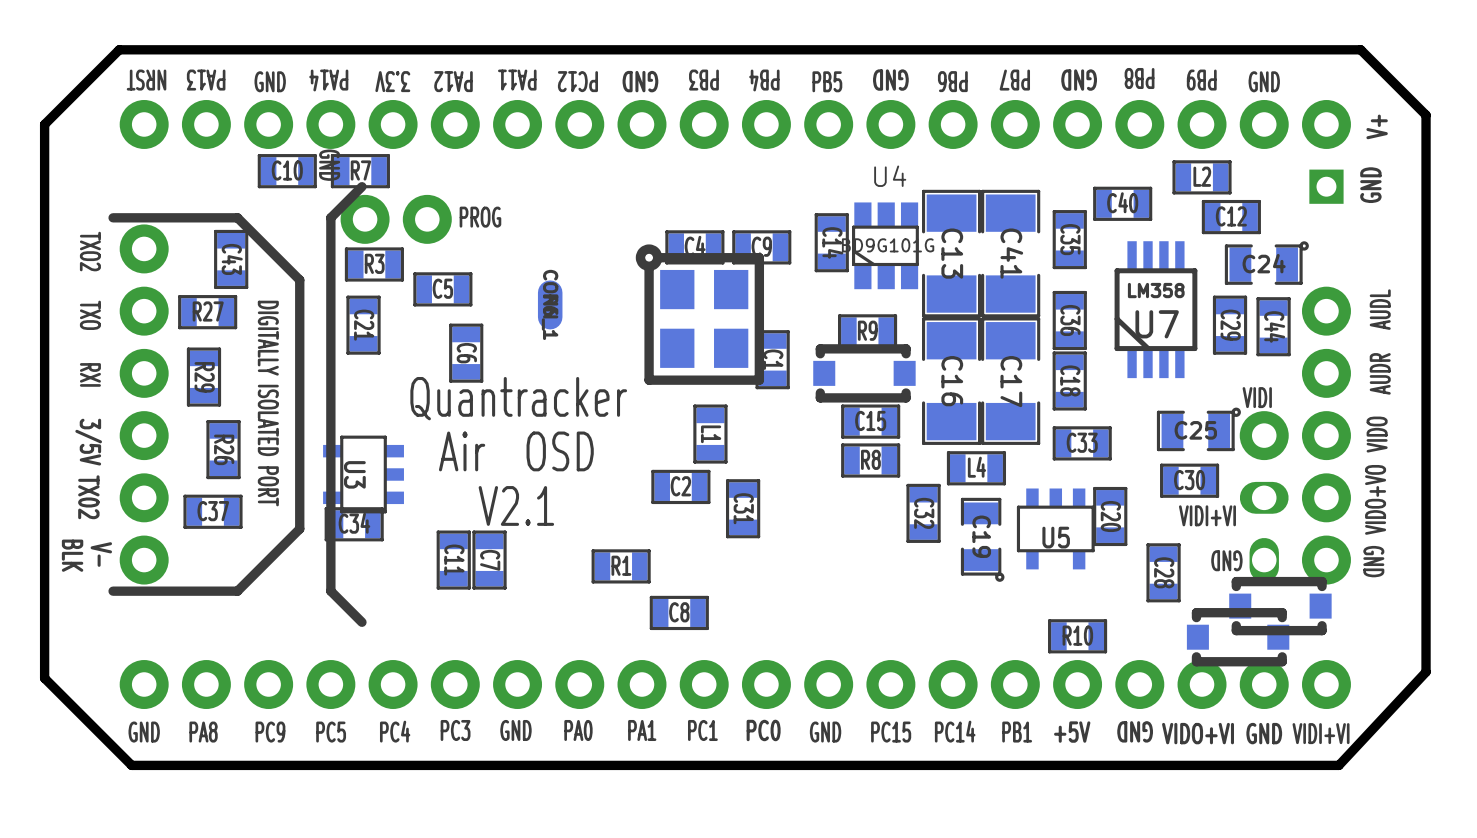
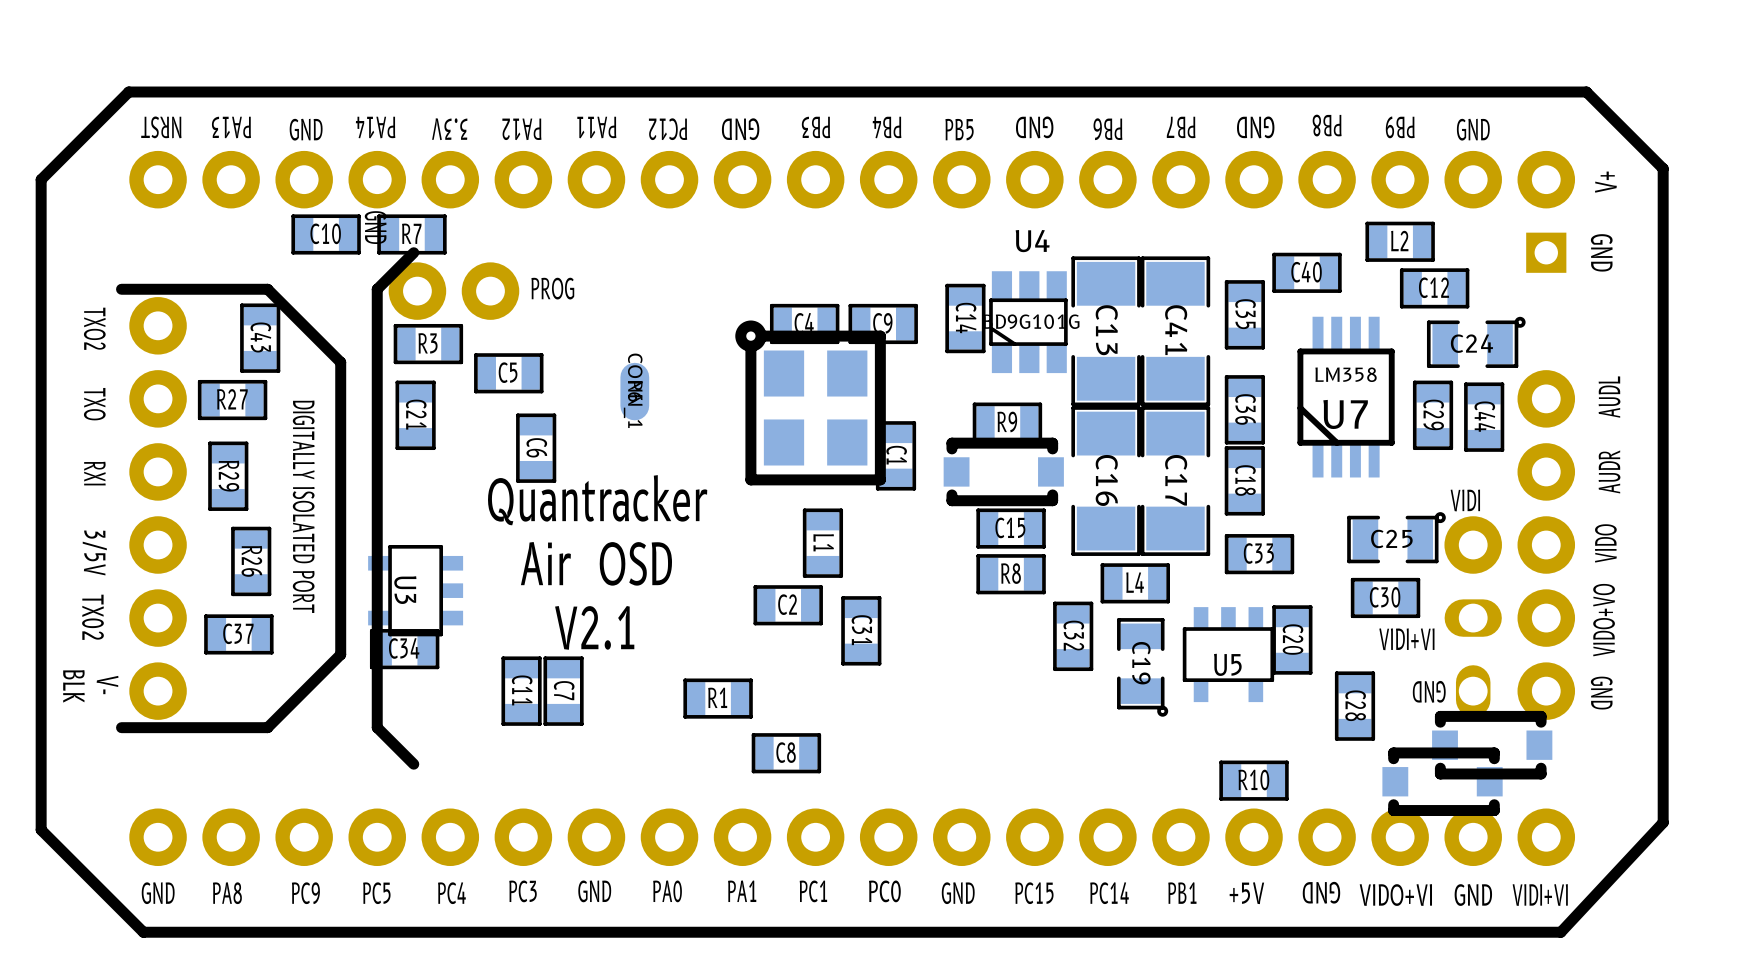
text rotation: 0° (1370, 185) -> 180° (1601, 252)

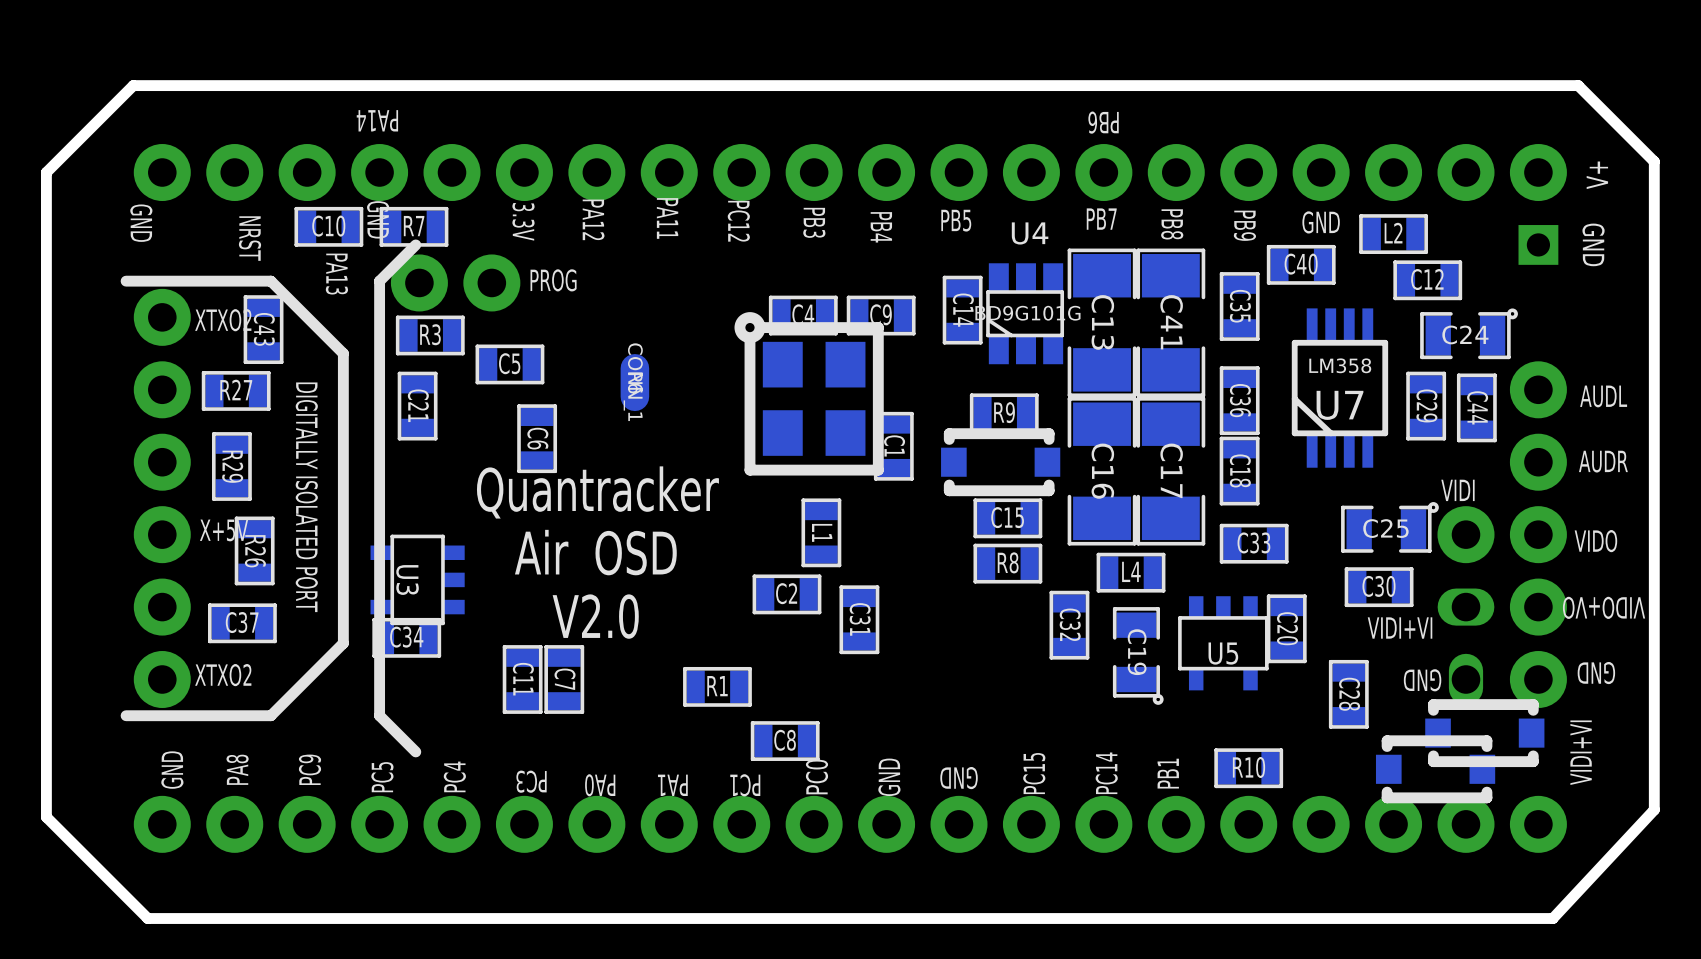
text rotation: 0° (1327, 125) -> 90° counterclockwise (1172, 224)
text position: PB8 (1327, 125) -> PB8 (1172, 224)
text rotation: 0° (161, 127) -> 90° counterclockwise (250, 238)
text position: NRST (161, 127) -> NRST (250, 238)
text rotation: 0° (231, 127) -> 90° counterclockwise (336, 274)
text position: PA13 (231, 127) -> PA13 (336, 274)
text rotation: 0° (596, 127) -> 90° counterclockwise (667, 218)
text position: PA11 (596, 127) -> PA11 (667, 218)
text rotation: 0° (815, 127) -> 90° counterclockwise (814, 222)
text position: PB3 (815, 127) -> PB3 (814, 222)
text rotation: 0° (887, 127) -> 90° counterclockwise (881, 227)
text position: PB4 (887, 127) -> PB4 (881, 227)
text: GND (1034, 127) -> none
text rotation: 0° (1181, 127) -> 180° (1101, 219)
text position: PB7 (1181, 127) -> PB7 (1101, 219)
text: GND (1255, 127) -> none
text rotation: 0° (1400, 127) -> 90° counterclockwise (1244, 225)
text position: PB9 (1400, 127) -> PB9 (1244, 225)
text rotation: 0° (306, 129) -> 90° clockwise (141, 223)
text position: GND (306, 129) -> GND (141, 223)
text rotation: 0° (449, 129) -> 90° counterclockwise (523, 221)
text position: 3.3V (449, 129) -> 3.3V (523, 221)
text rotation: 0° (521, 129) -> 90° counterclockwise (593, 219)
text position: PA12 (521, 129) -> PA12 (593, 219)
text rotation: 0° (668, 129) -> 90° counterclockwise (738, 221)
text position: PC12 (668, 129) -> PC12 (738, 221)
text: GND (740, 129) -> none
text position: PB5 (959, 129) -> PB5 (956, 220)
text: GND (1473, 129) -> none
text: none -> GND (1321, 222)
text: TXO2 (94, 328) -> none
text: none -> XTXO2 (223, 320)
text rotation: 0° (1609, 397) -> 90° clockwise (1603, 396)
text: TXO (94, 404) -> none
text rotation: 0° (1609, 471) -> 90° clockwise (1603, 461)
text: RXI (94, 473) -> none
text: none -> X+5V (224, 530)
text rotation: 0° (1605, 543) -> 90° clockwise (1595, 541)
text: 3/5V (94, 552) -> none
text: TX02 (92, 617) -> none
text rotation: 0° (1604, 620) -> 90° counterclockwise (1604, 607)
text: V2.1 (594, 627) -> V2.0 (595, 616)
text: V- (107, 685) -> none
text: BLK (73, 686) -> none
text: none -> XTXO2 (223, 675)
text rotation: 0° (1601, 693) -> 90° clockwise (1596, 673)
text: none -> GND (889, 777)
text: none -> GND (959, 778)
text rotation: 0° (523, 891) -> 180° (531, 781)
text position: PC3 (523, 891) -> PC3 (531, 781)
text: GND (594, 891) -> none
text rotation: 0° (667, 891) -> 180° (600, 785)
text position: PA0 (667, 891) -> PA0 (600, 785)
text rotation: 0° (742, 891) -> 180° (672, 785)
text position: PA1 (742, 891) -> PA1 (672, 785)
text rotation: 0° (813, 891) -> 180° (745, 785)
text position: PC1 (813, 891) -> PC1 (745, 785)
text rotation: 0° (884, 891) -> 90° counterclockwise (816, 776)
text position: PC0 (884, 891) -> PC0 (816, 776)
text: GND (1321, 892) -> none
text rotation: 0° (158, 893) -> 90° counterclockwise (172, 770)
text position: GND (158, 893) -> GND (172, 770)
text rotation: 0° (227, 893) -> 90° counterclockwise (237, 769)
text position: PA8 (227, 893) -> PA8 (237, 769)
text rotation: 0° (305, 893) -> 90° counterclockwise (309, 769)
text position: PC9 (305, 893) -> PC9 (309, 769)
text rotation: 0° (376, 893) -> 90° counterclockwise (382, 777)
text position: PC5 (376, 893) -> PC5 (382, 777)
text rotation: 0° (451, 893) -> 90° counterclockwise (454, 776)
text position: PC4 (451, 893) -> PC4 (454, 776)
text: GND (958, 893) -> none
text rotation: 0° (1034, 893) -> 90° counterclockwise (1034, 773)
text position: PC15 (1034, 893) -> PC15 (1034, 773)
text rotation: 0° (1109, 893) -> 90° counterclockwise (1106, 773)
text position: PC14 (1109, 893) -> PC14 (1106, 773)
text rotation: 0° (1182, 893) -> 90° counterclockwise (1168, 773)
text position: PB1 (1182, 893) -> PB1 (1168, 773)
text: +5V (1246, 893) -> none
text: VIDO+VI (1395, 895) -> none
text: GND (1473, 895) -> none
text rotation: 0° (1540, 895) -> 90° counterclockwise (1581, 752)
text position: VIDI+VI (1540, 895) -> VIDI+VI (1581, 752)

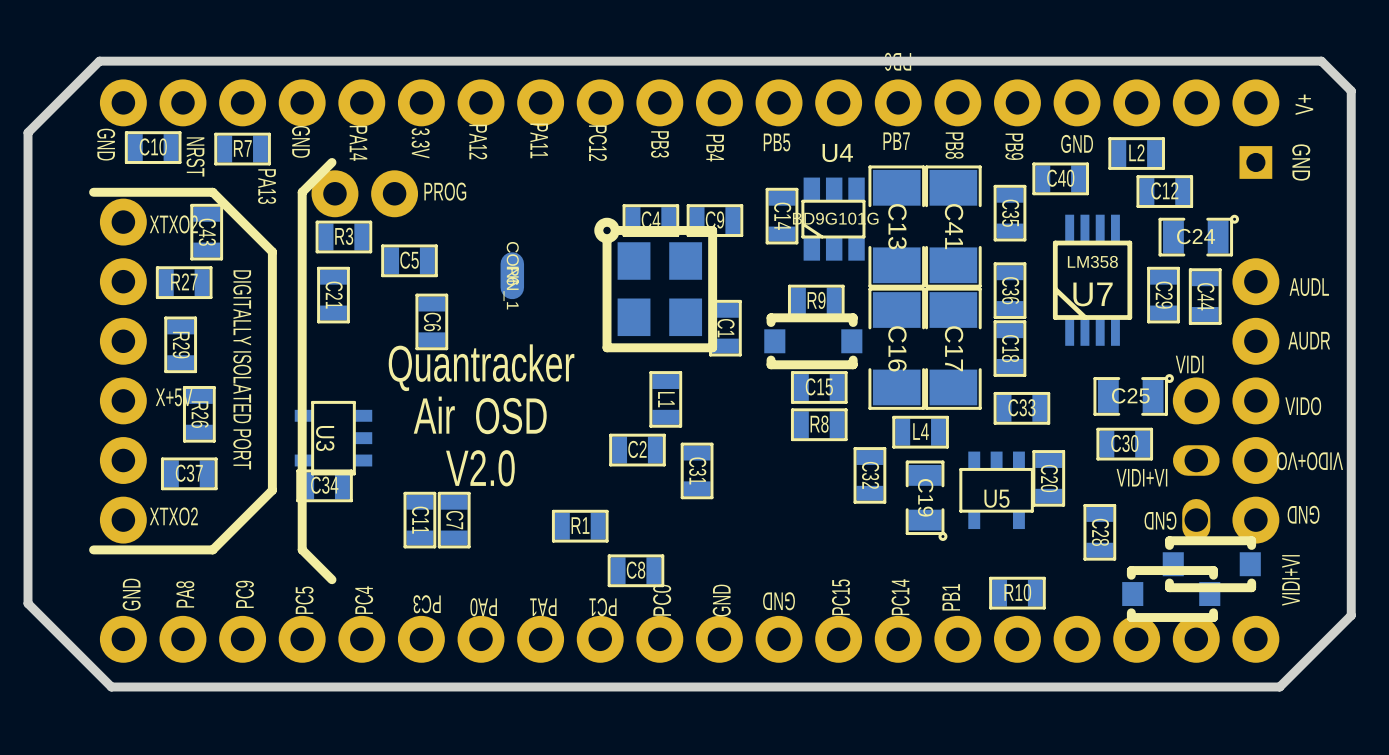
text rotation: 0° (377, 120) -> 90° counterclockwise (358, 143)
text position: PA14 (377, 120) -> PA14 (358, 143)
board edge: (1654, 161) (1578, 85) (133, 85) (46, 172) (46, 208) -> (1351, 93) (1351, 90) (1321, 61) (99, 61) (28, 132)
C10 position: (328, 226) -> (153, 147)
R7 position: (413, 226) -> (242, 149)
board edge: (46, 780) (46, 817) (147, 918) (1552, 918) (1654, 809) (1654, 795) -> (28, 603) (111, 687) (1279, 687) (1351, 615)

